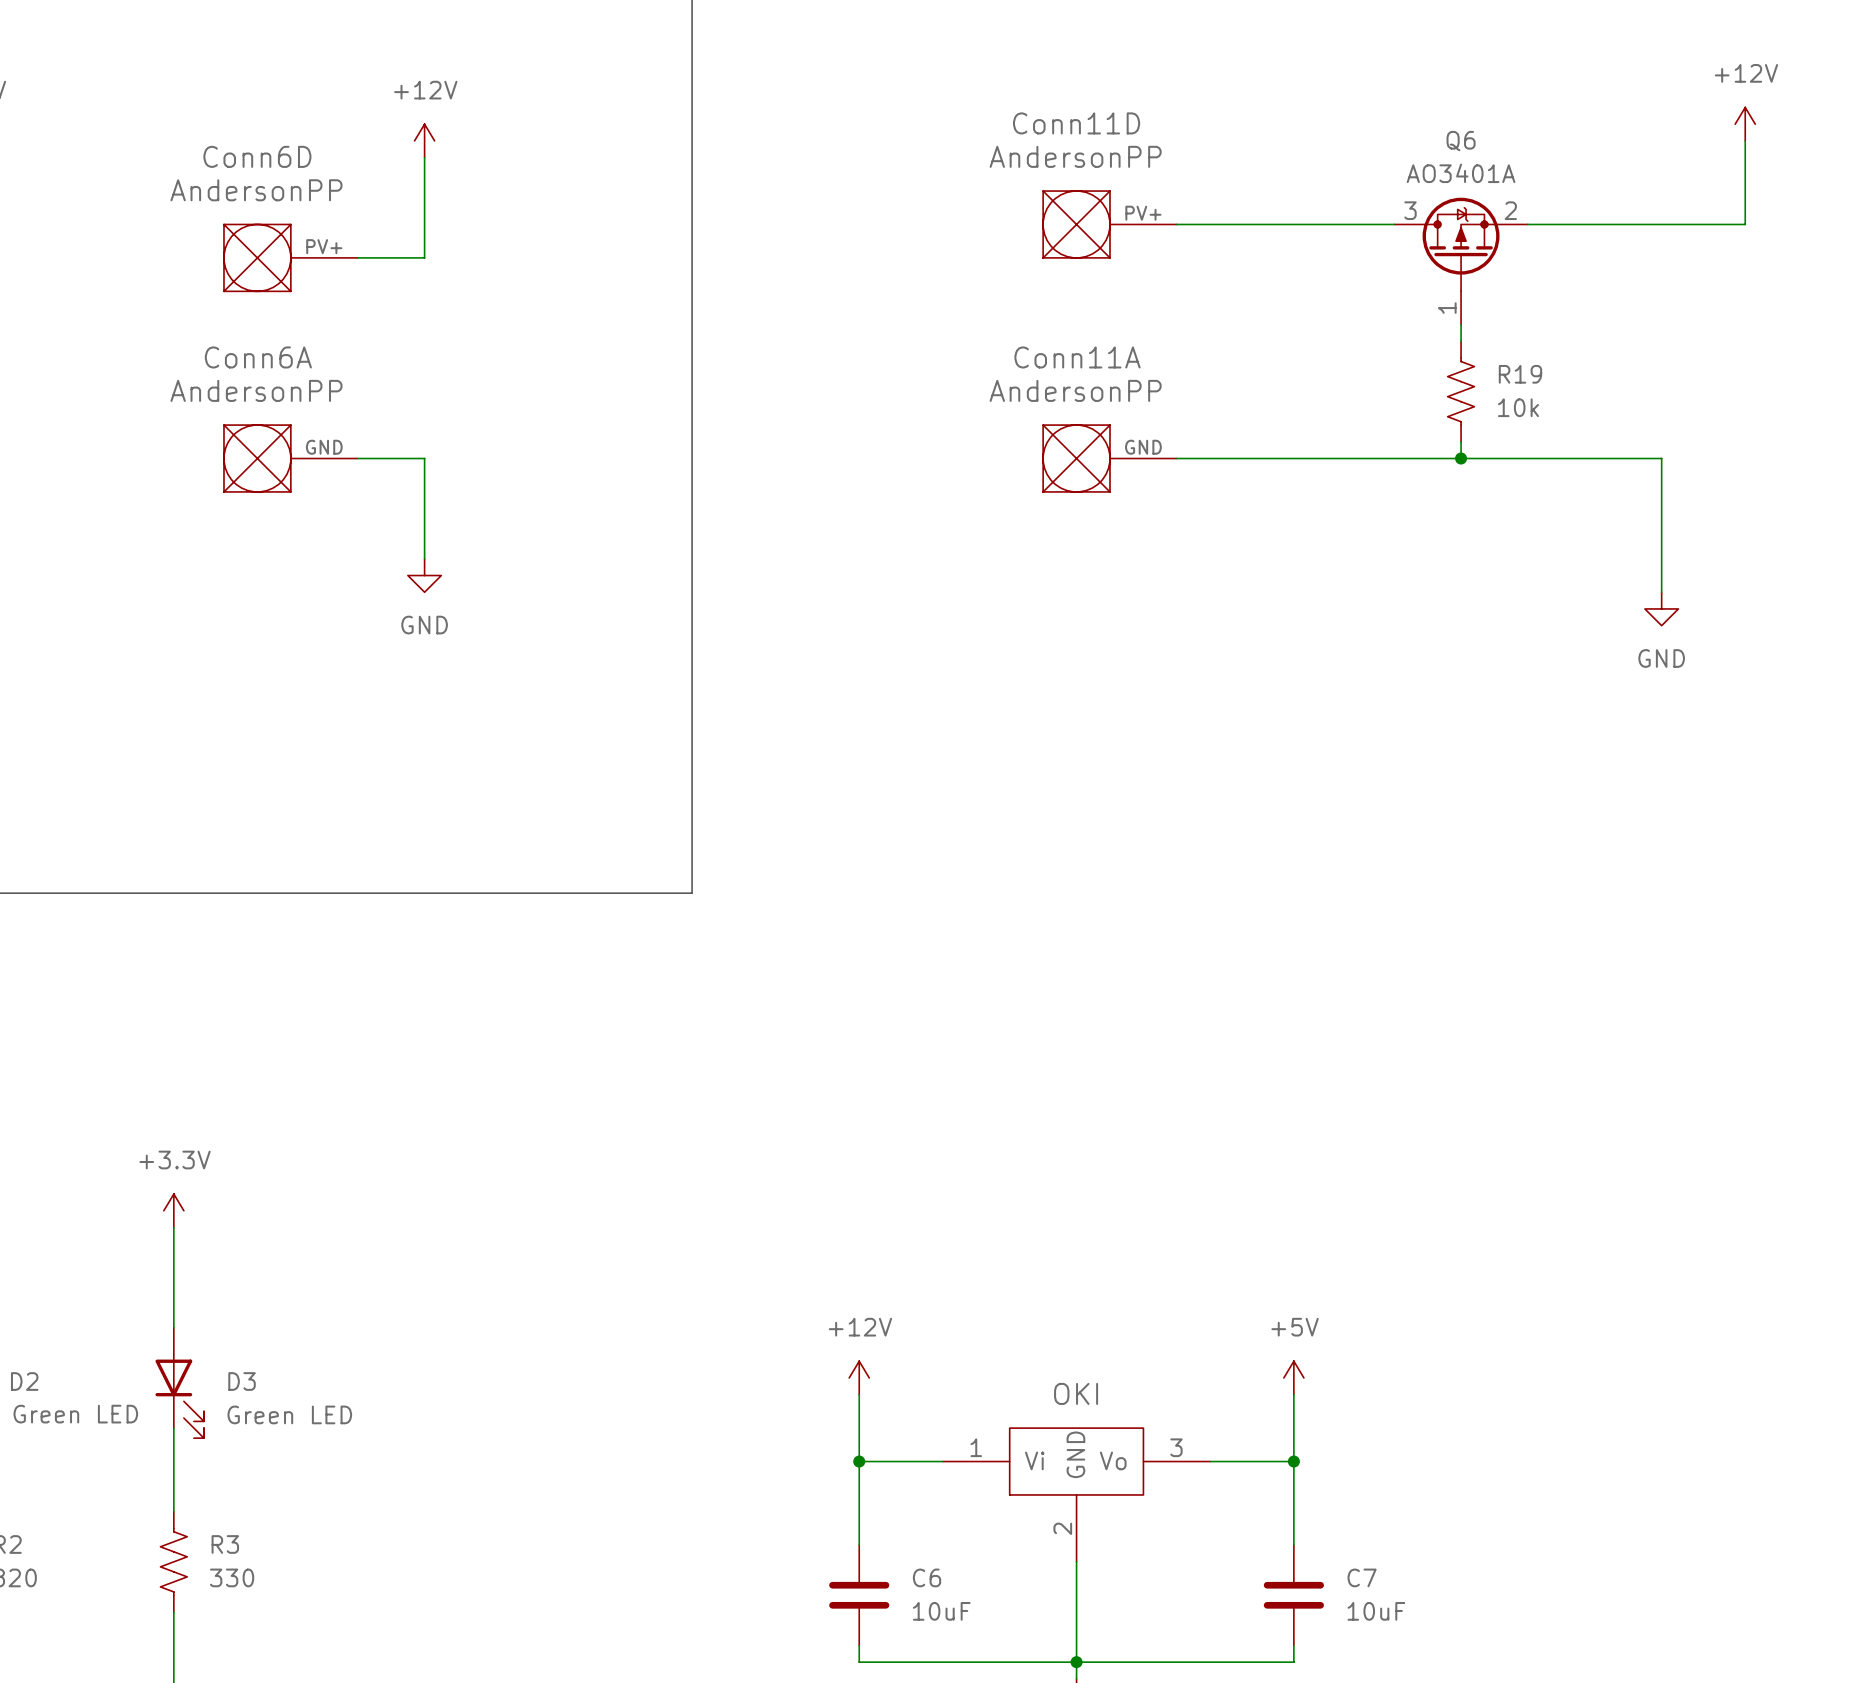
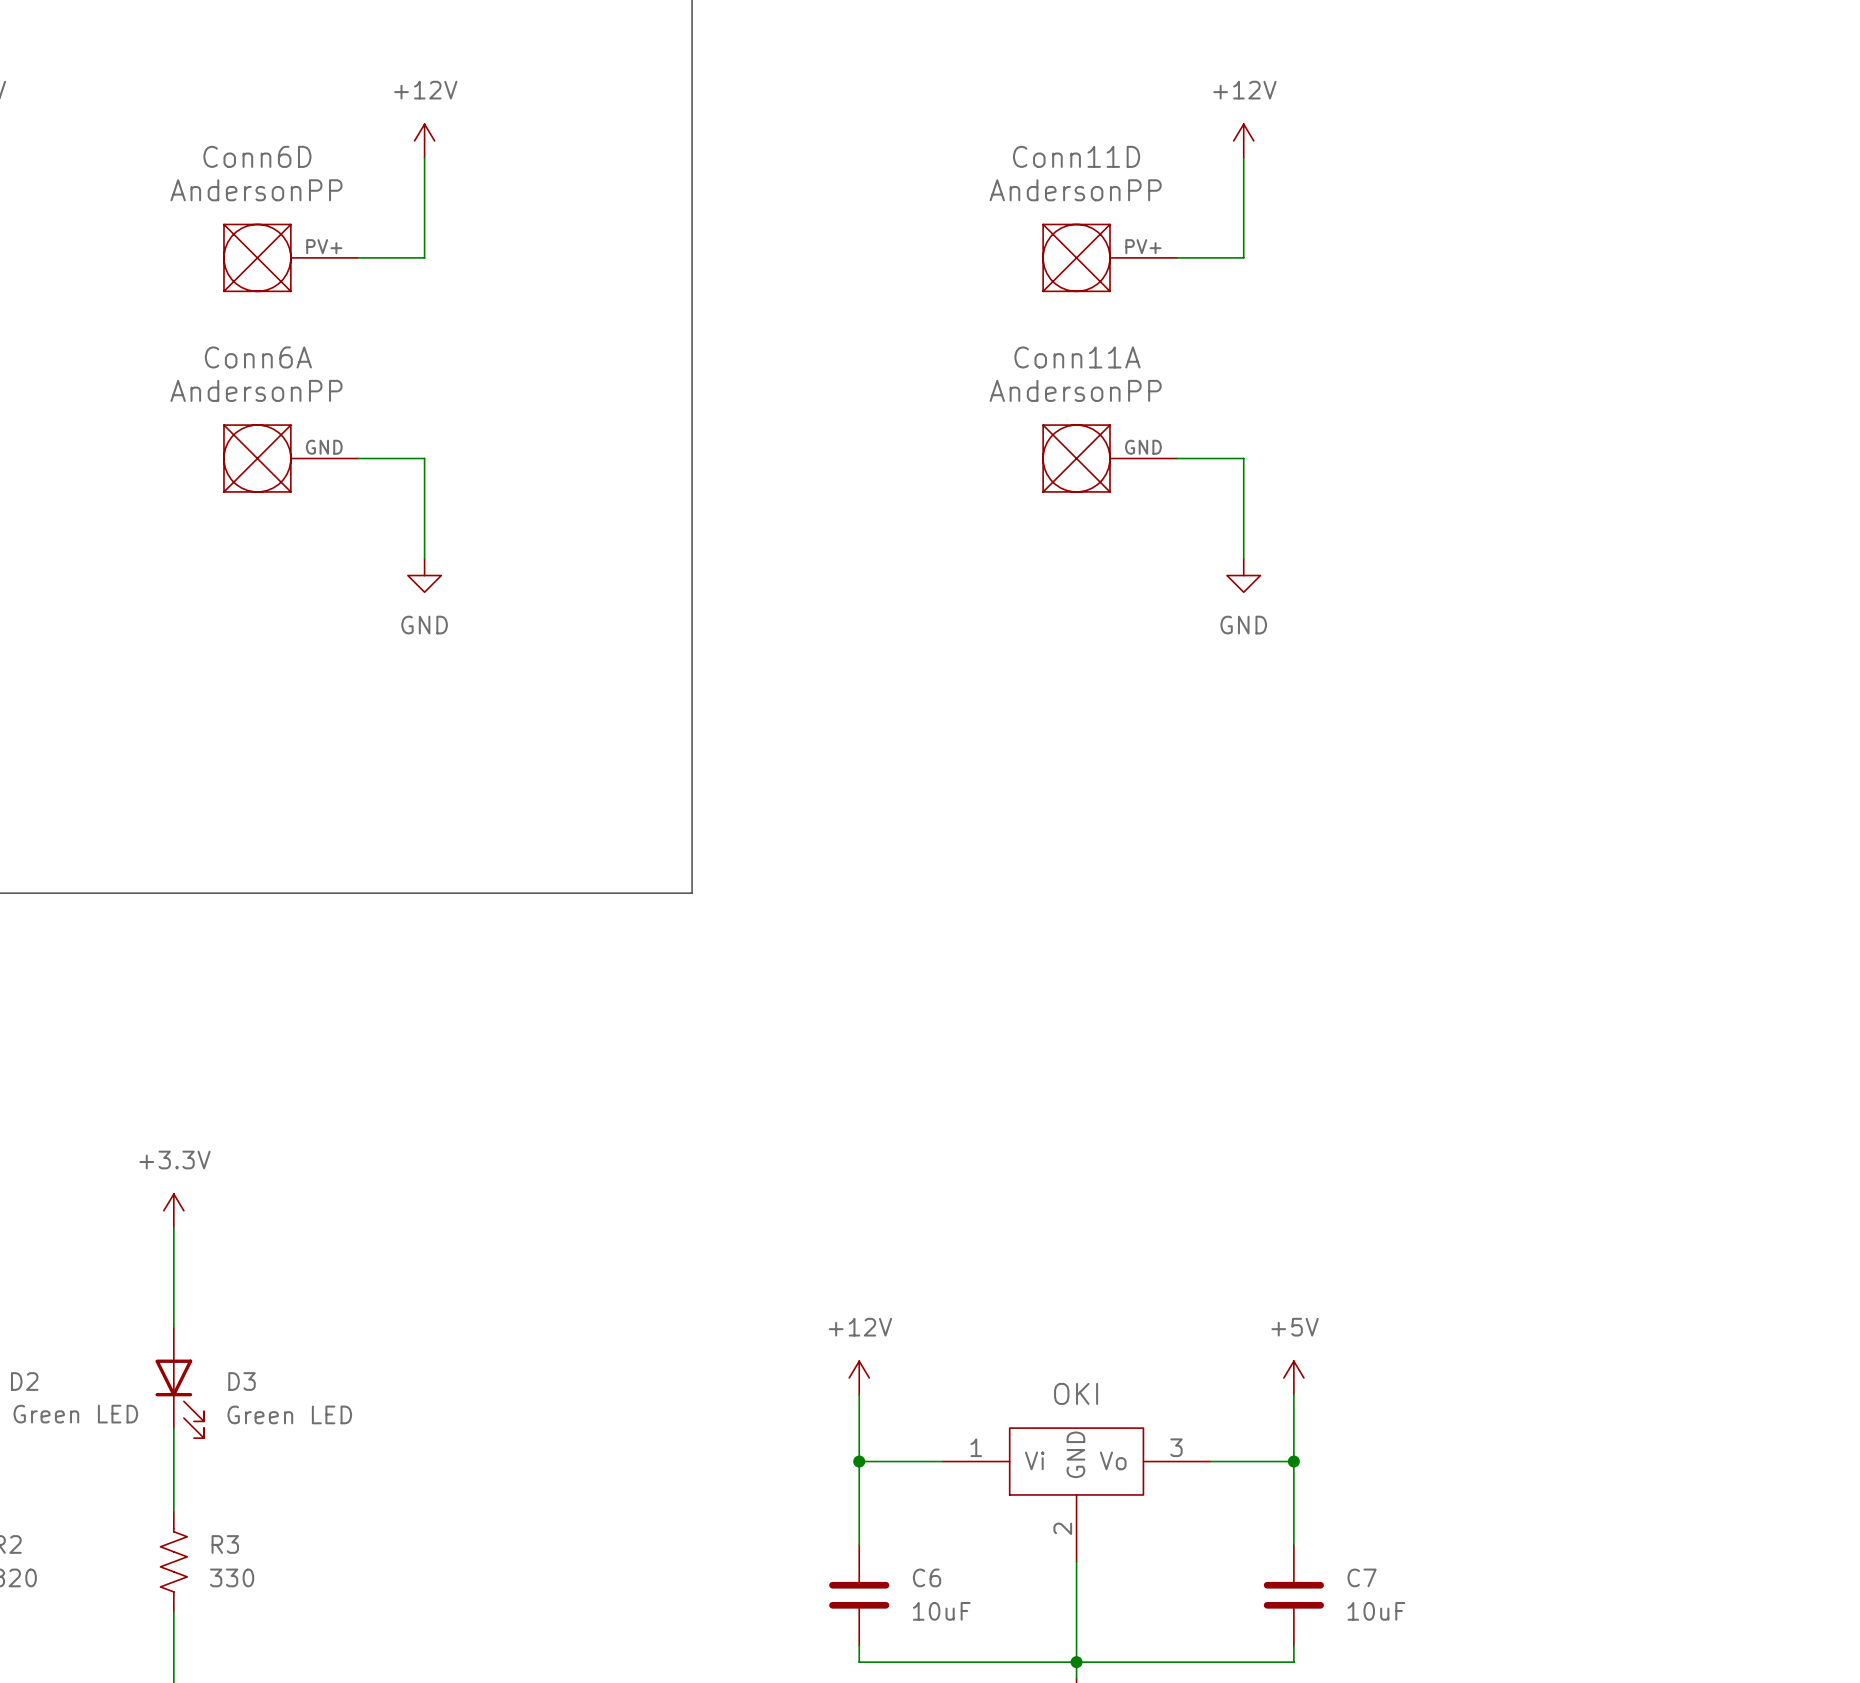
power symbol: +12V (1745, 124) -> none
power symbol: none -> +12V (1243, 140)
wire: (1745, 140) (1745, 224) (1527, 224) -> none
wire: none -> (1243, 157) (1243, 257) (1176, 257)
Conn11D position: (1109, 224) -> (1109, 257)
wire: (1176, 224) (1394, 224) -> none
Q6: AO3401A (1461, 261) -> none
wire: (1461, 324) (1461, 341) -> none
R19: 10k (1461, 391) -> none
wire: (1461, 441) (1461, 458) -> none
wire: (1243, 458) (1661, 458) (1661, 592) -> (1243, 458) (1243, 558)
junction: (1461, 458) -> none
power symbol: none -> GND (1243, 575)
power symbol: GND (1661, 608) -> none

